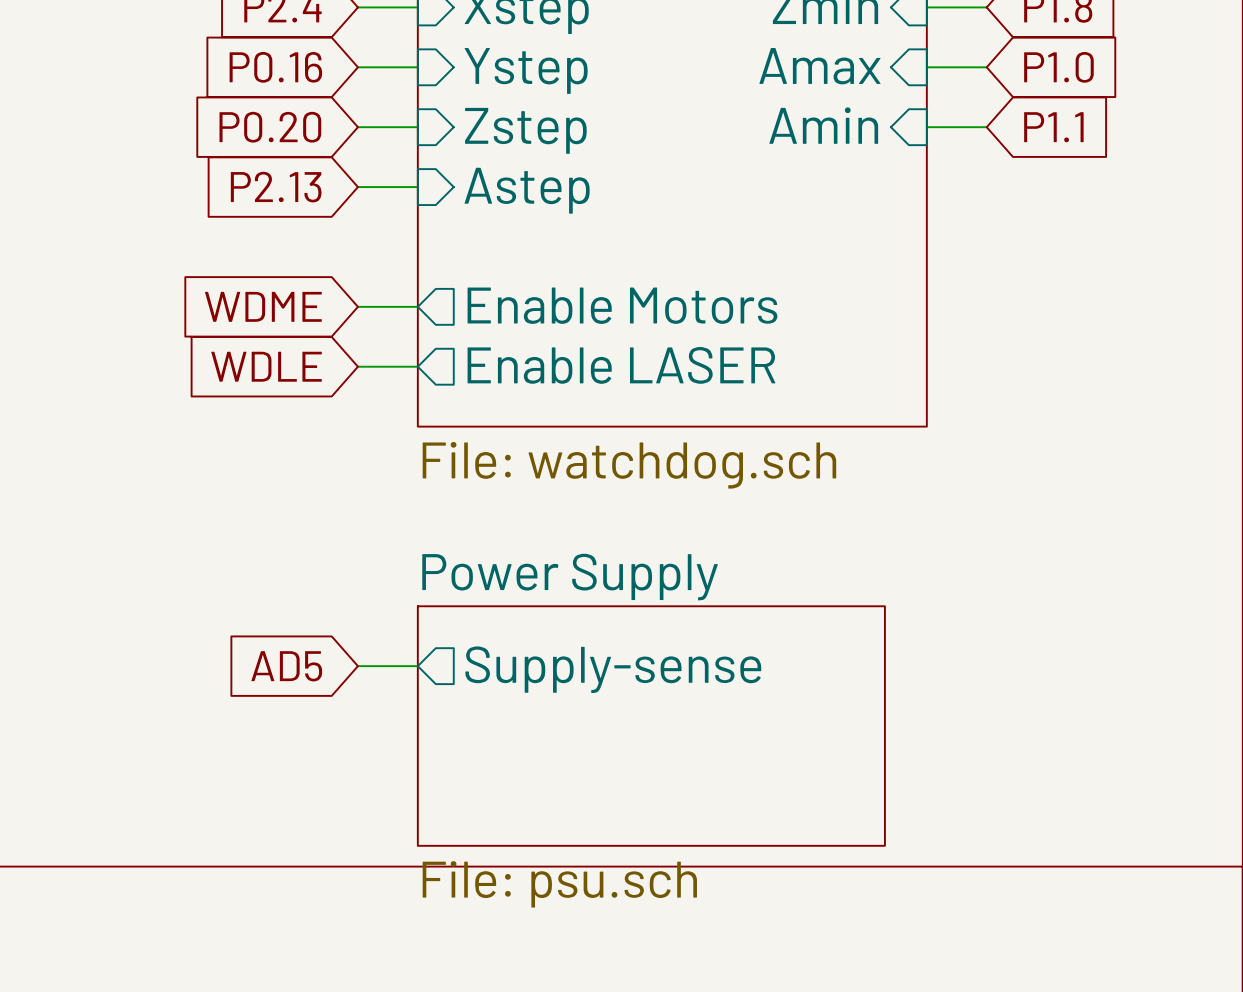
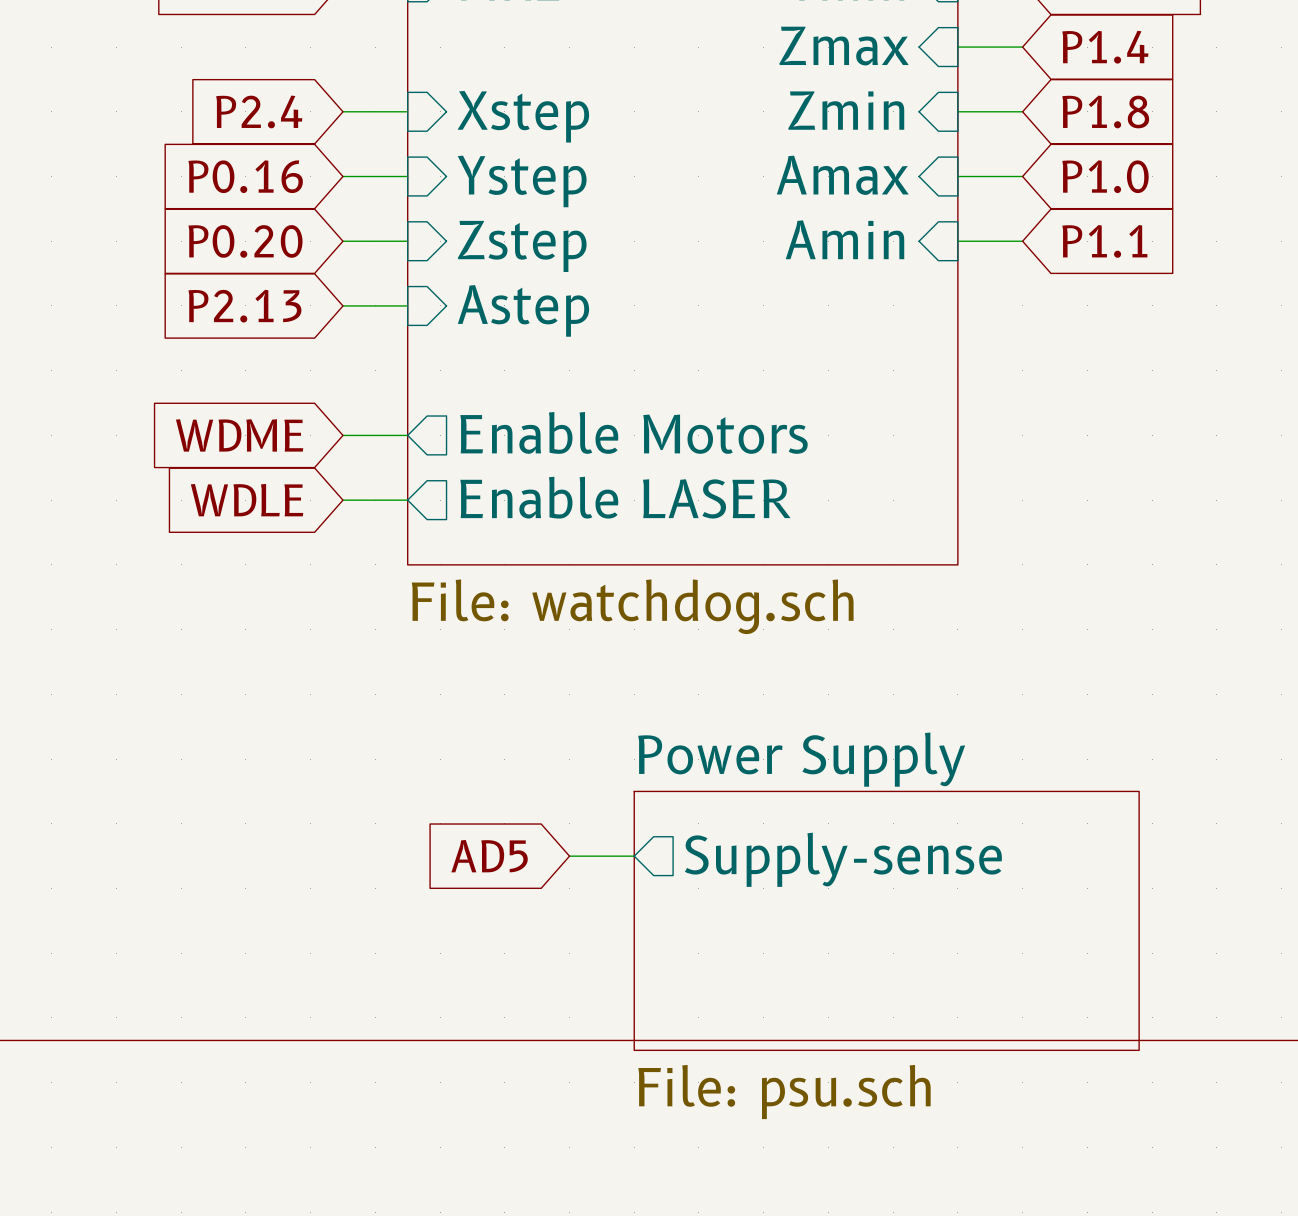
global label position: AD5 (286, 666) -> AD5 (489, 856)
wire: (357, 666) (417, 666) -> (569, 856) (634, 856)
sheet pin position: Supply-sense (613, 669) -> Supply-sense (843, 859)
sheet Power Supply position: (651, 726) -> (886, 920)

